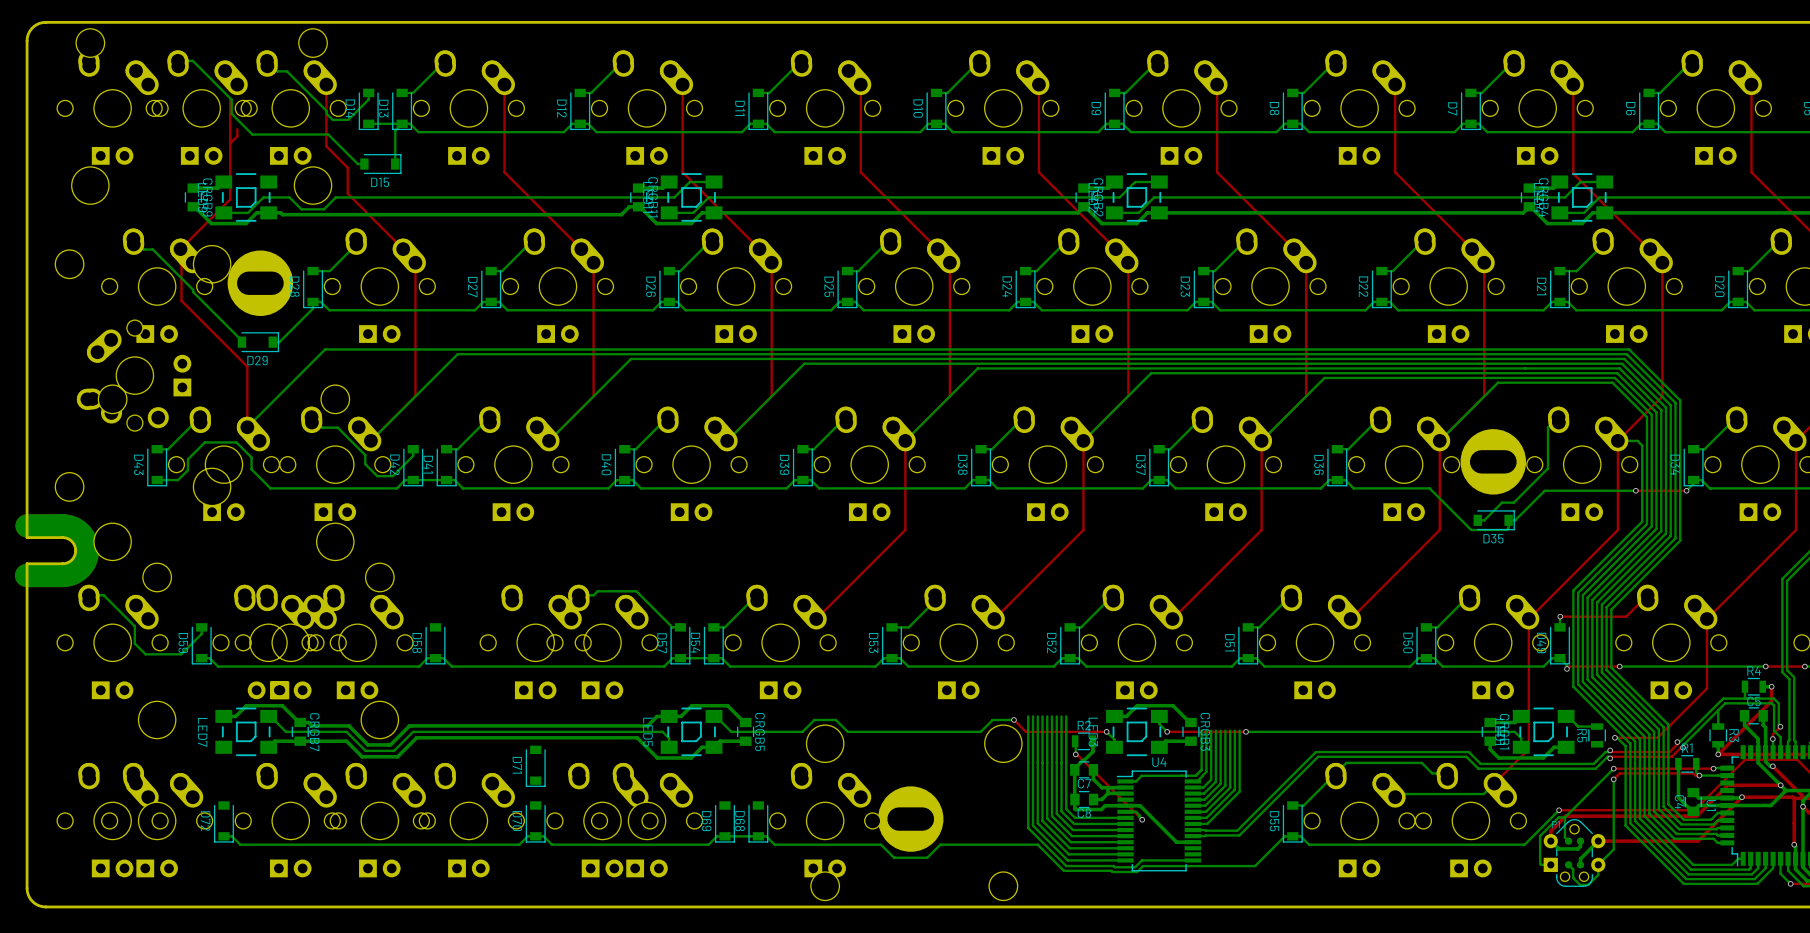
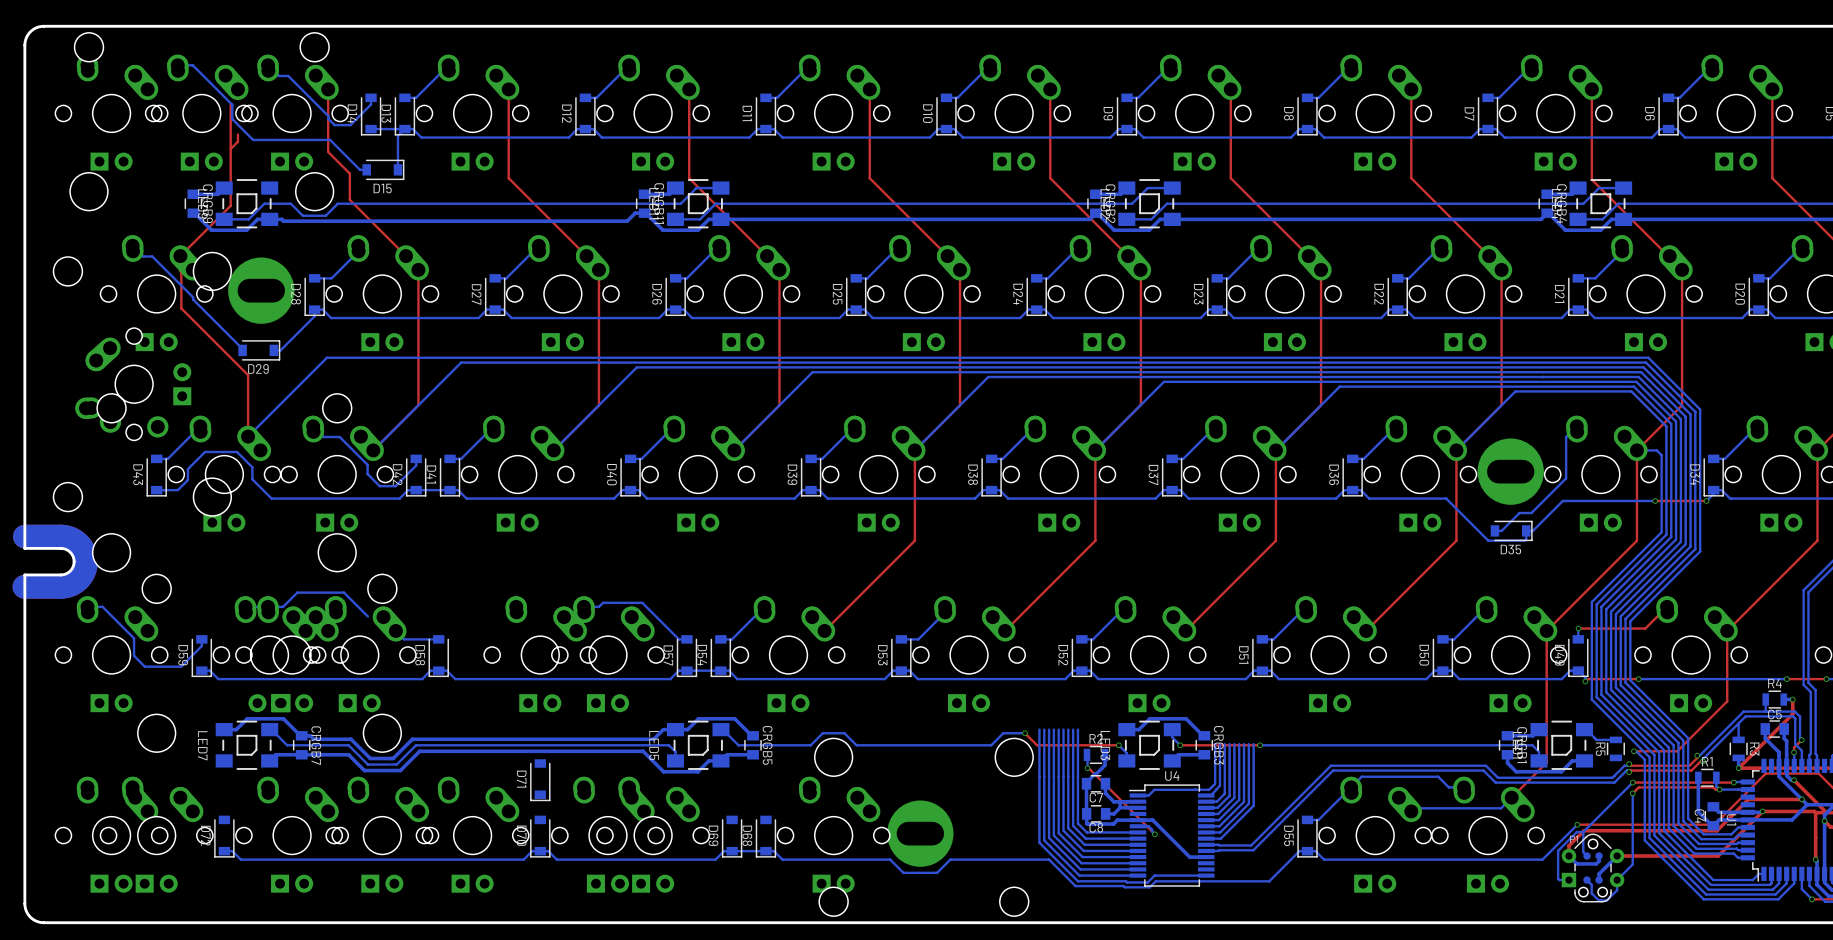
bottom track: none -> (245, 606) (283, 606) (297, 592) (344, 592) (367, 616)
bottom track: none -> (395, 630) (404, 639) (438, 639)

